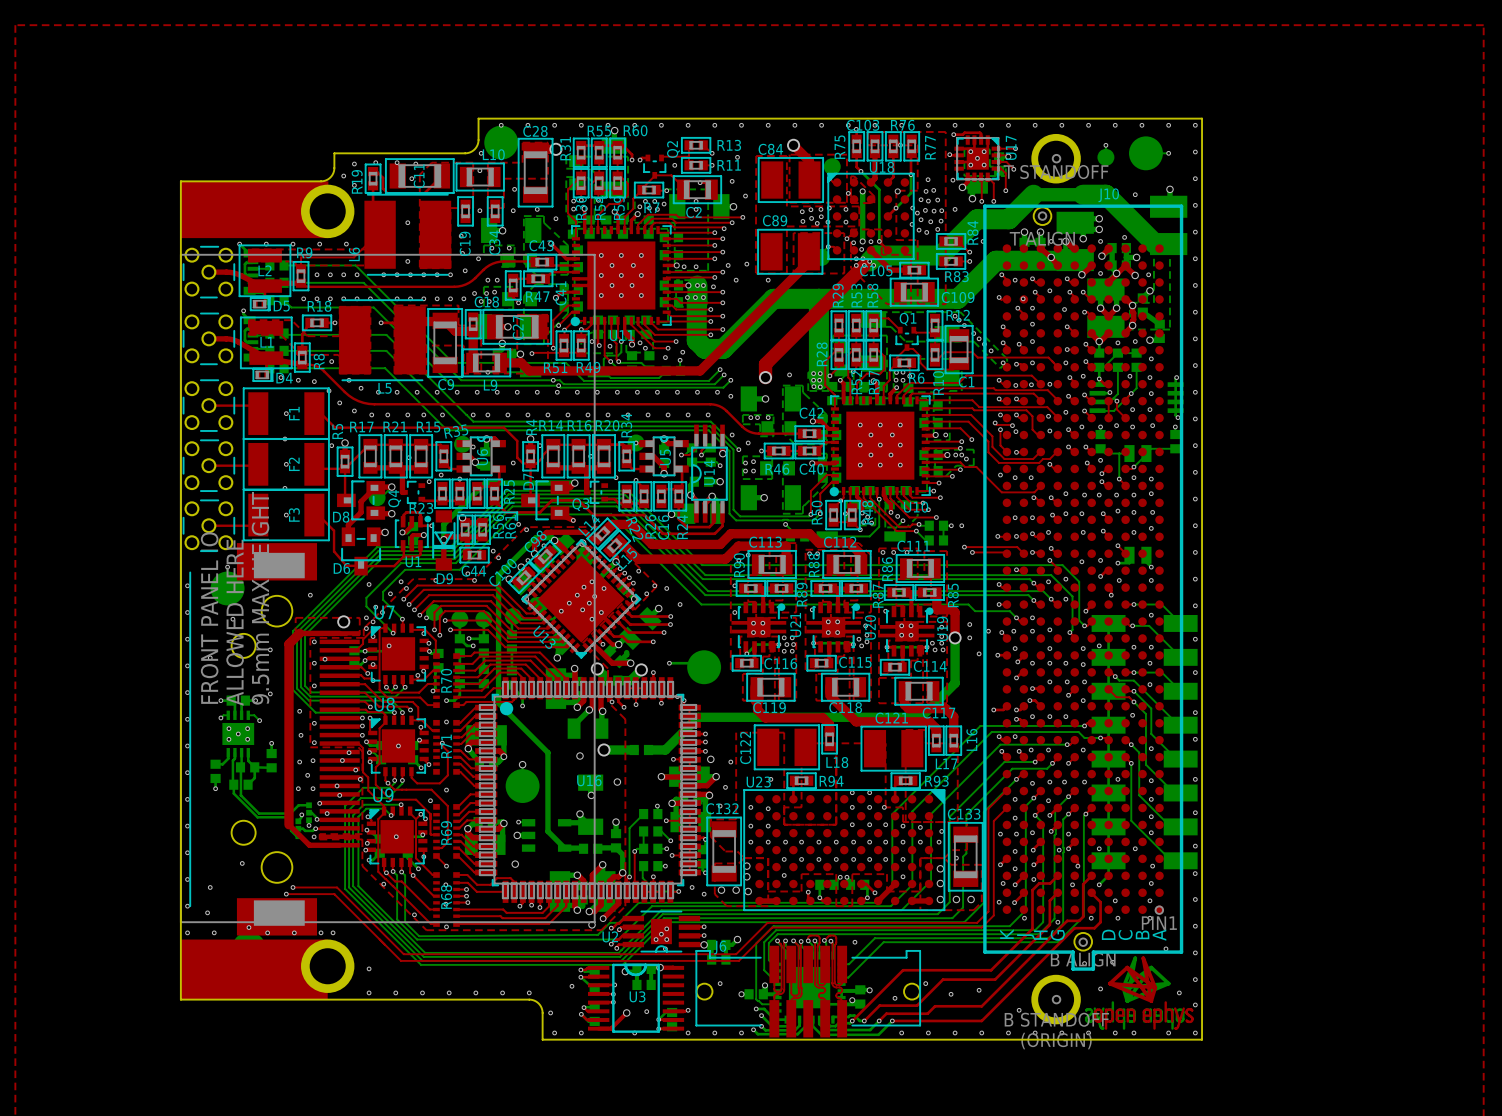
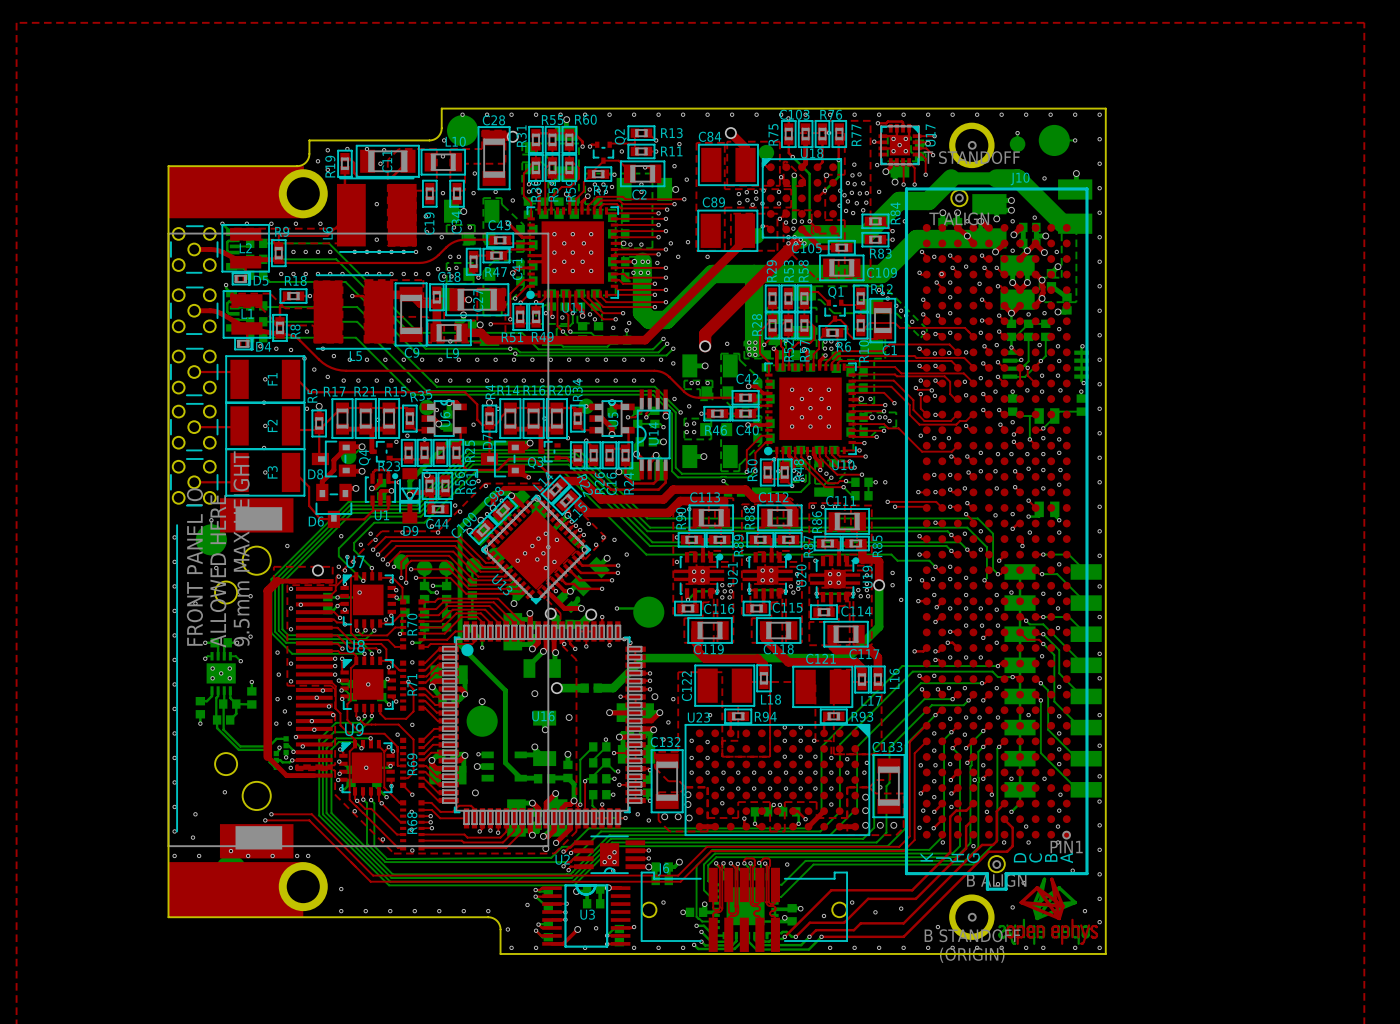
bottom track: (643, 831) (643, 845) -> (593, 762) (593, 760) (606, 746)
bottom track: (657, 831) (661, 831) (670, 840) -> (593, 775) (606, 762) (614, 771) (618, 771)

